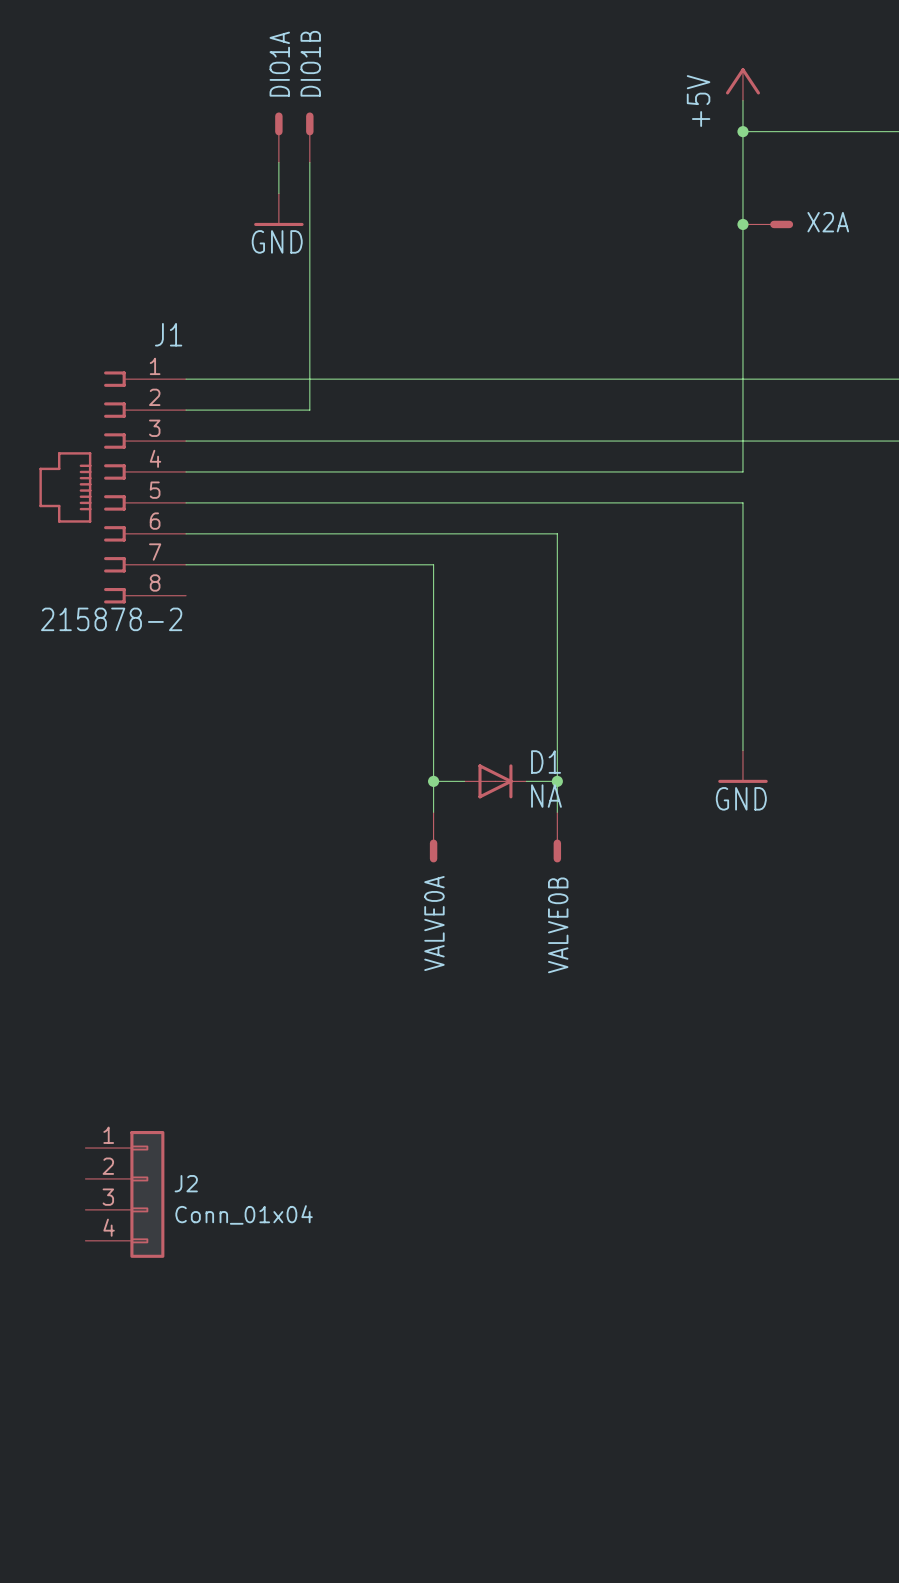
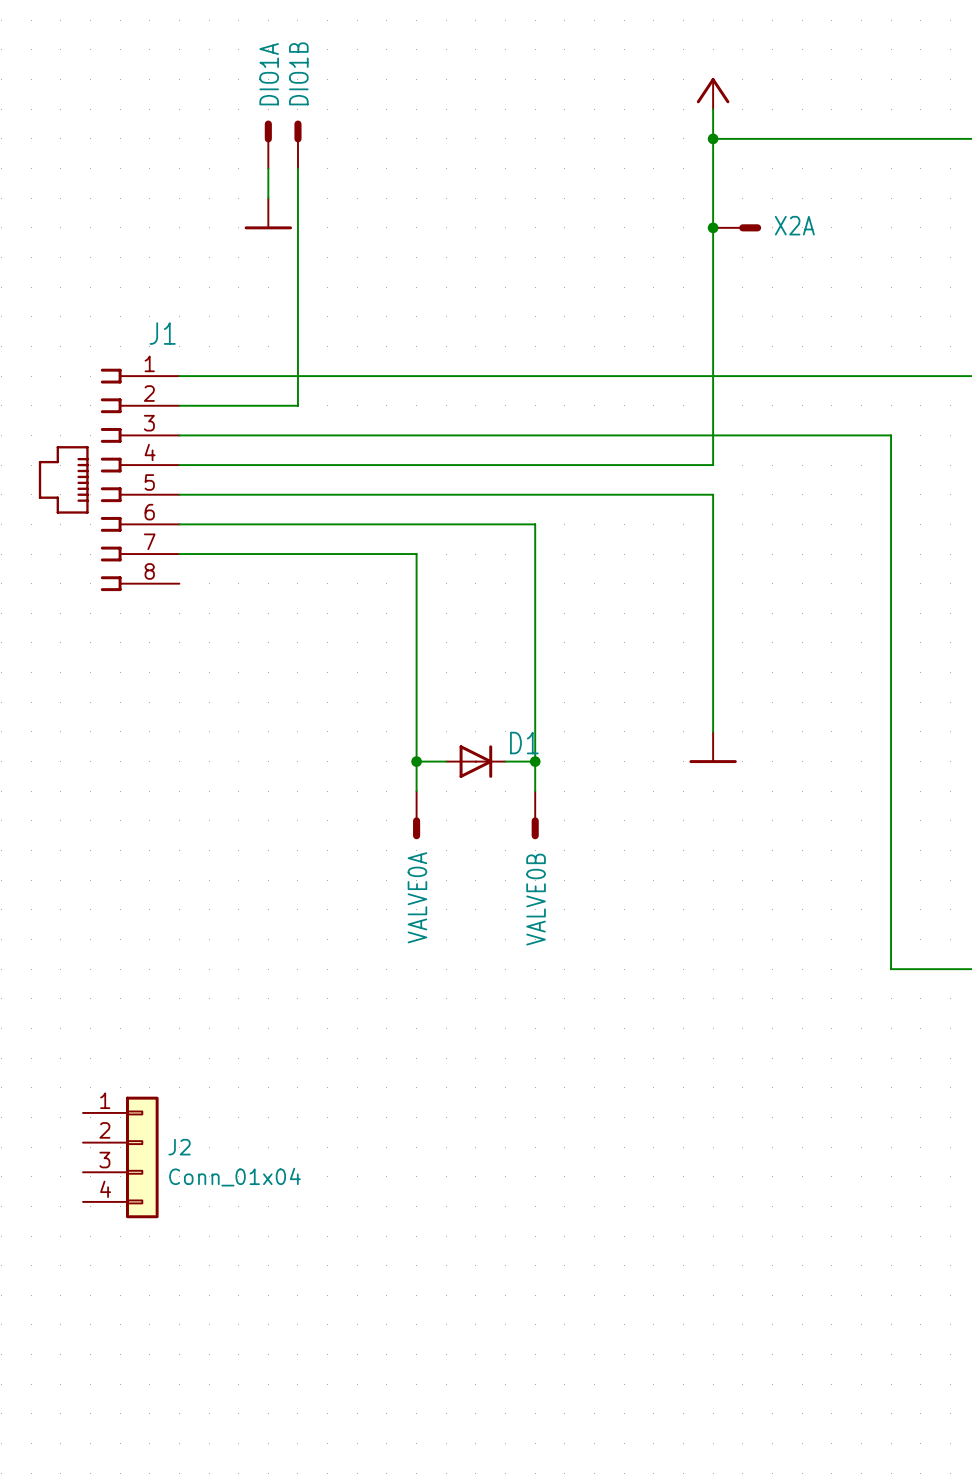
power symbol text: +5V (698, 101) -> none
power symbol text: GND (277, 241) -> none
J1 value: 215878-2 (111, 619) -> none
D1 value: NA (546, 796) -> none
power symbol text: GND (741, 798) -> none

